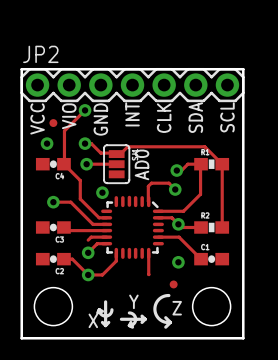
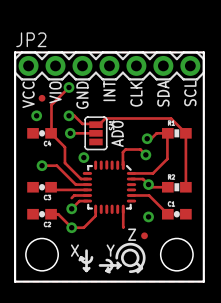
line: (168, 295) (159, 299) (154, 309) (159, 319) (170, 322) -> none
drawing: none -> [121, 248, 140, 268]
text position: Z (177, 308) -> Z (132, 234)
line: none -> (116, 258) (119, 250) (125, 244) (132, 244) (140, 248) (144, 255) (143, 262) (138, 269) (130, 271)
text position: X (93, 320) -> X (74, 250)

